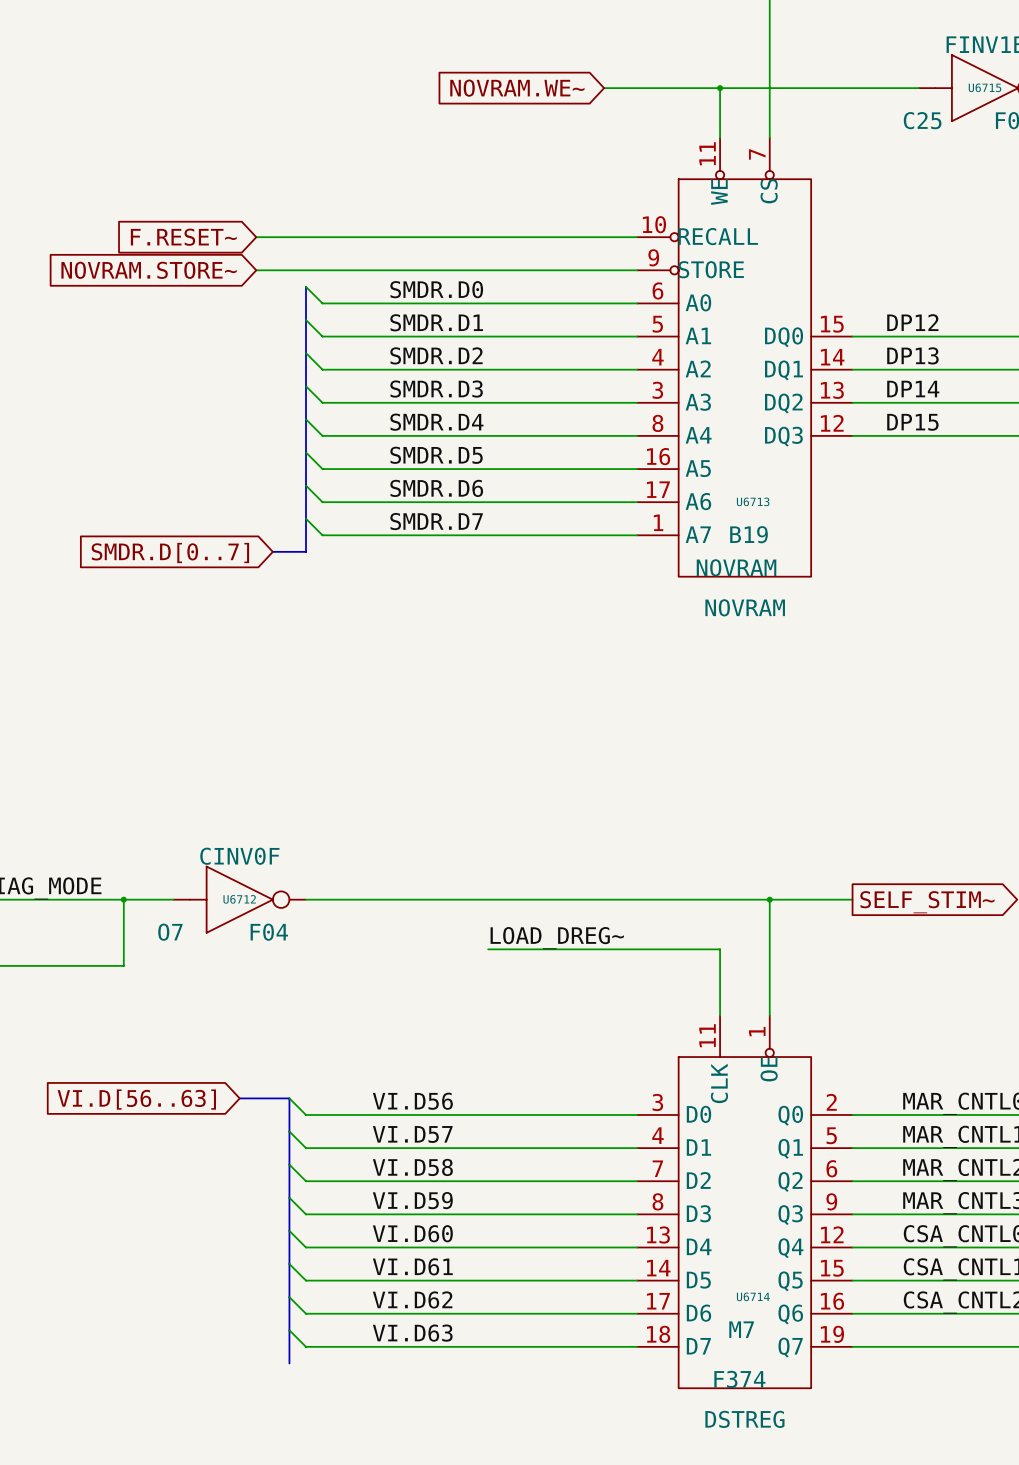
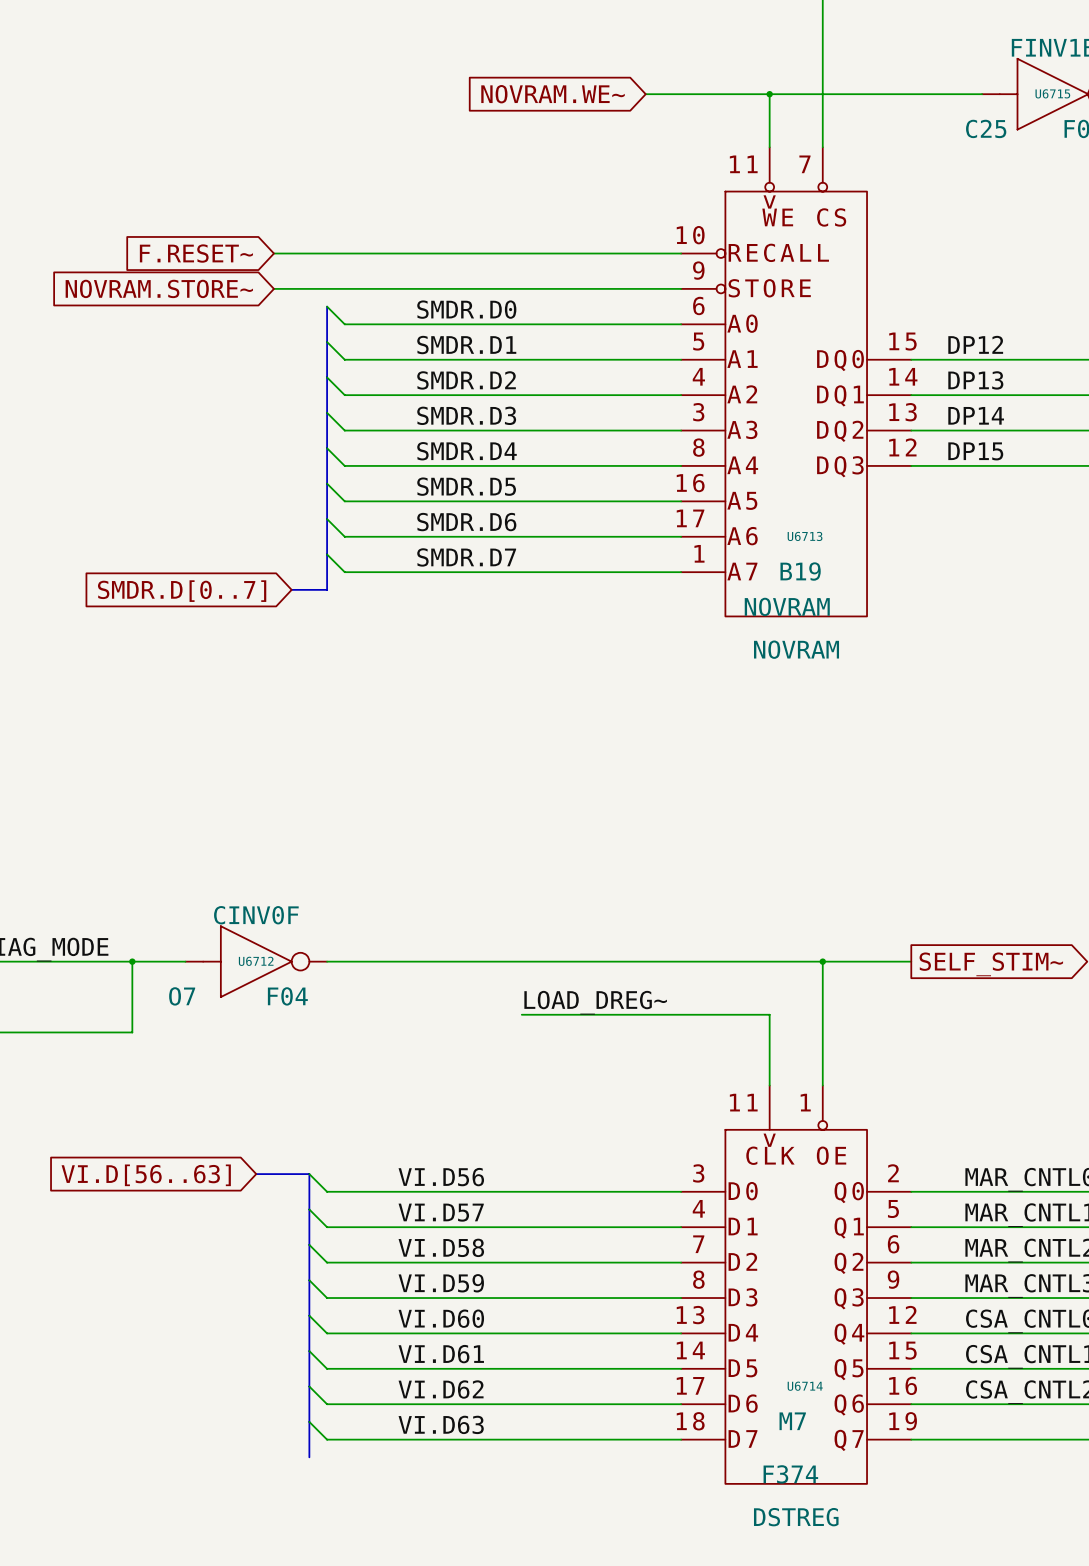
U6713 symbol: [637, 137, 853, 577] -> [681, 147, 912, 617]
U6714 symbol: [637, 1015, 853, 1389] -> [681, 1085, 912, 1484]

